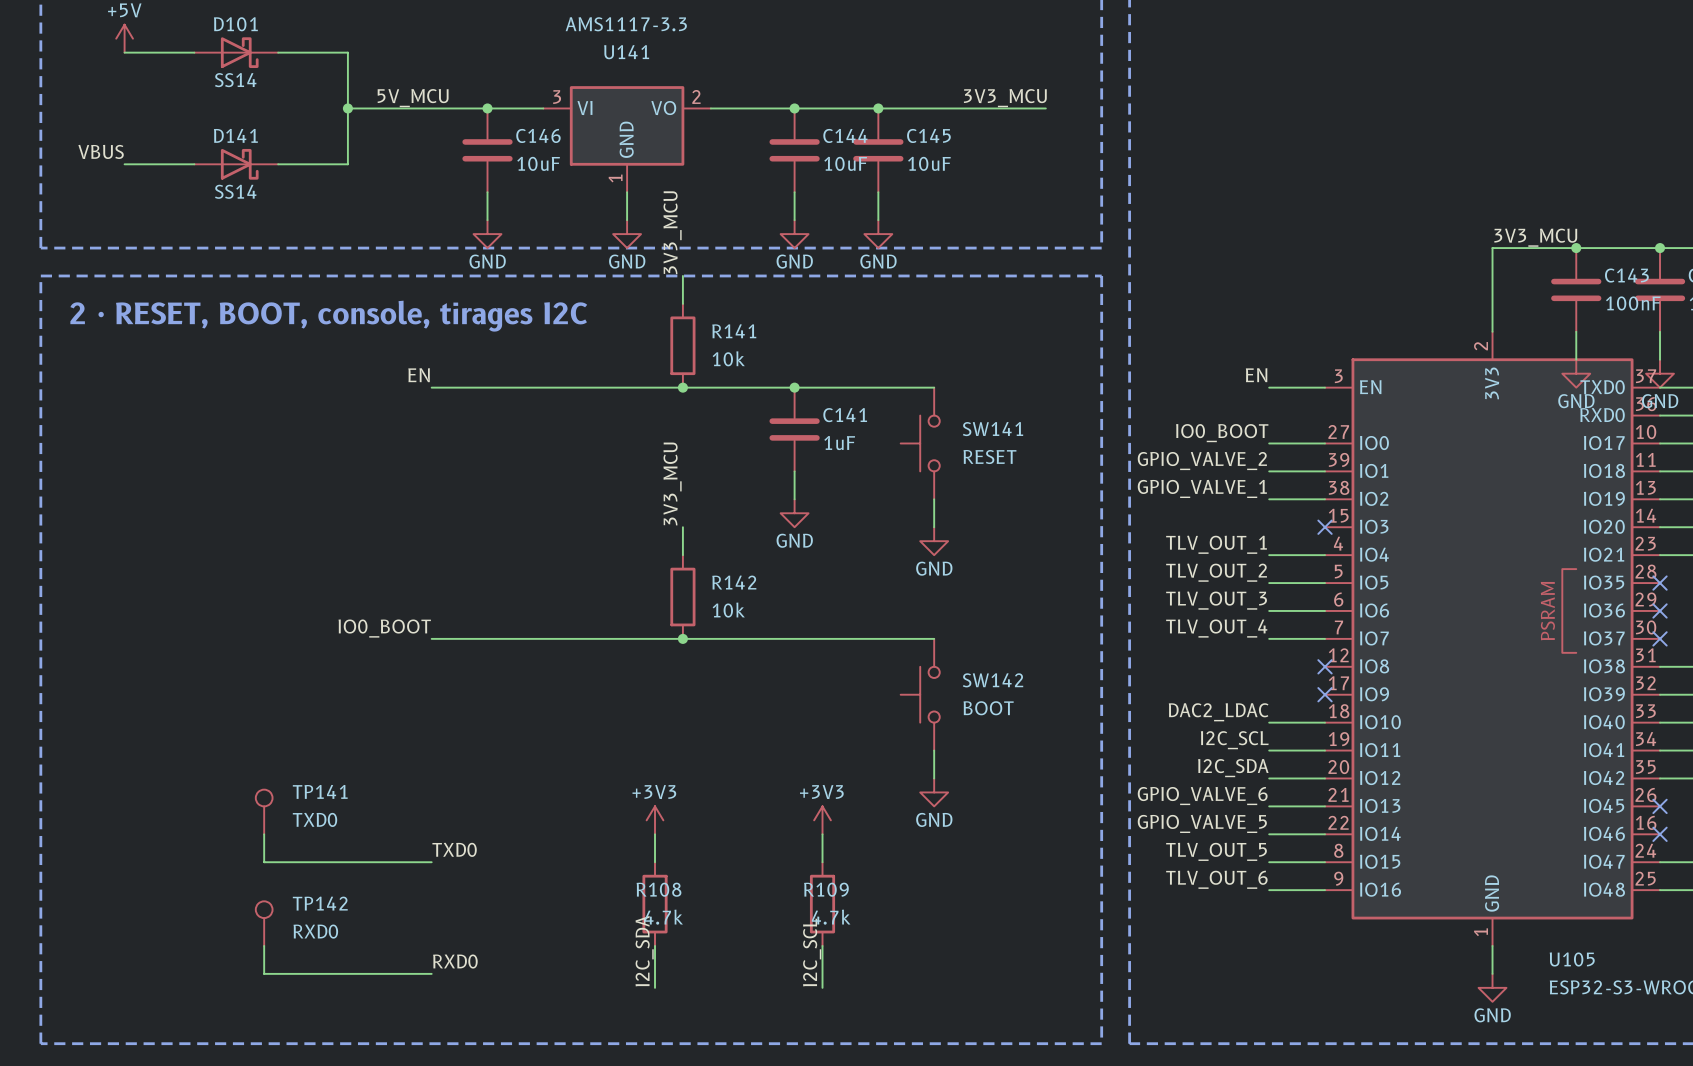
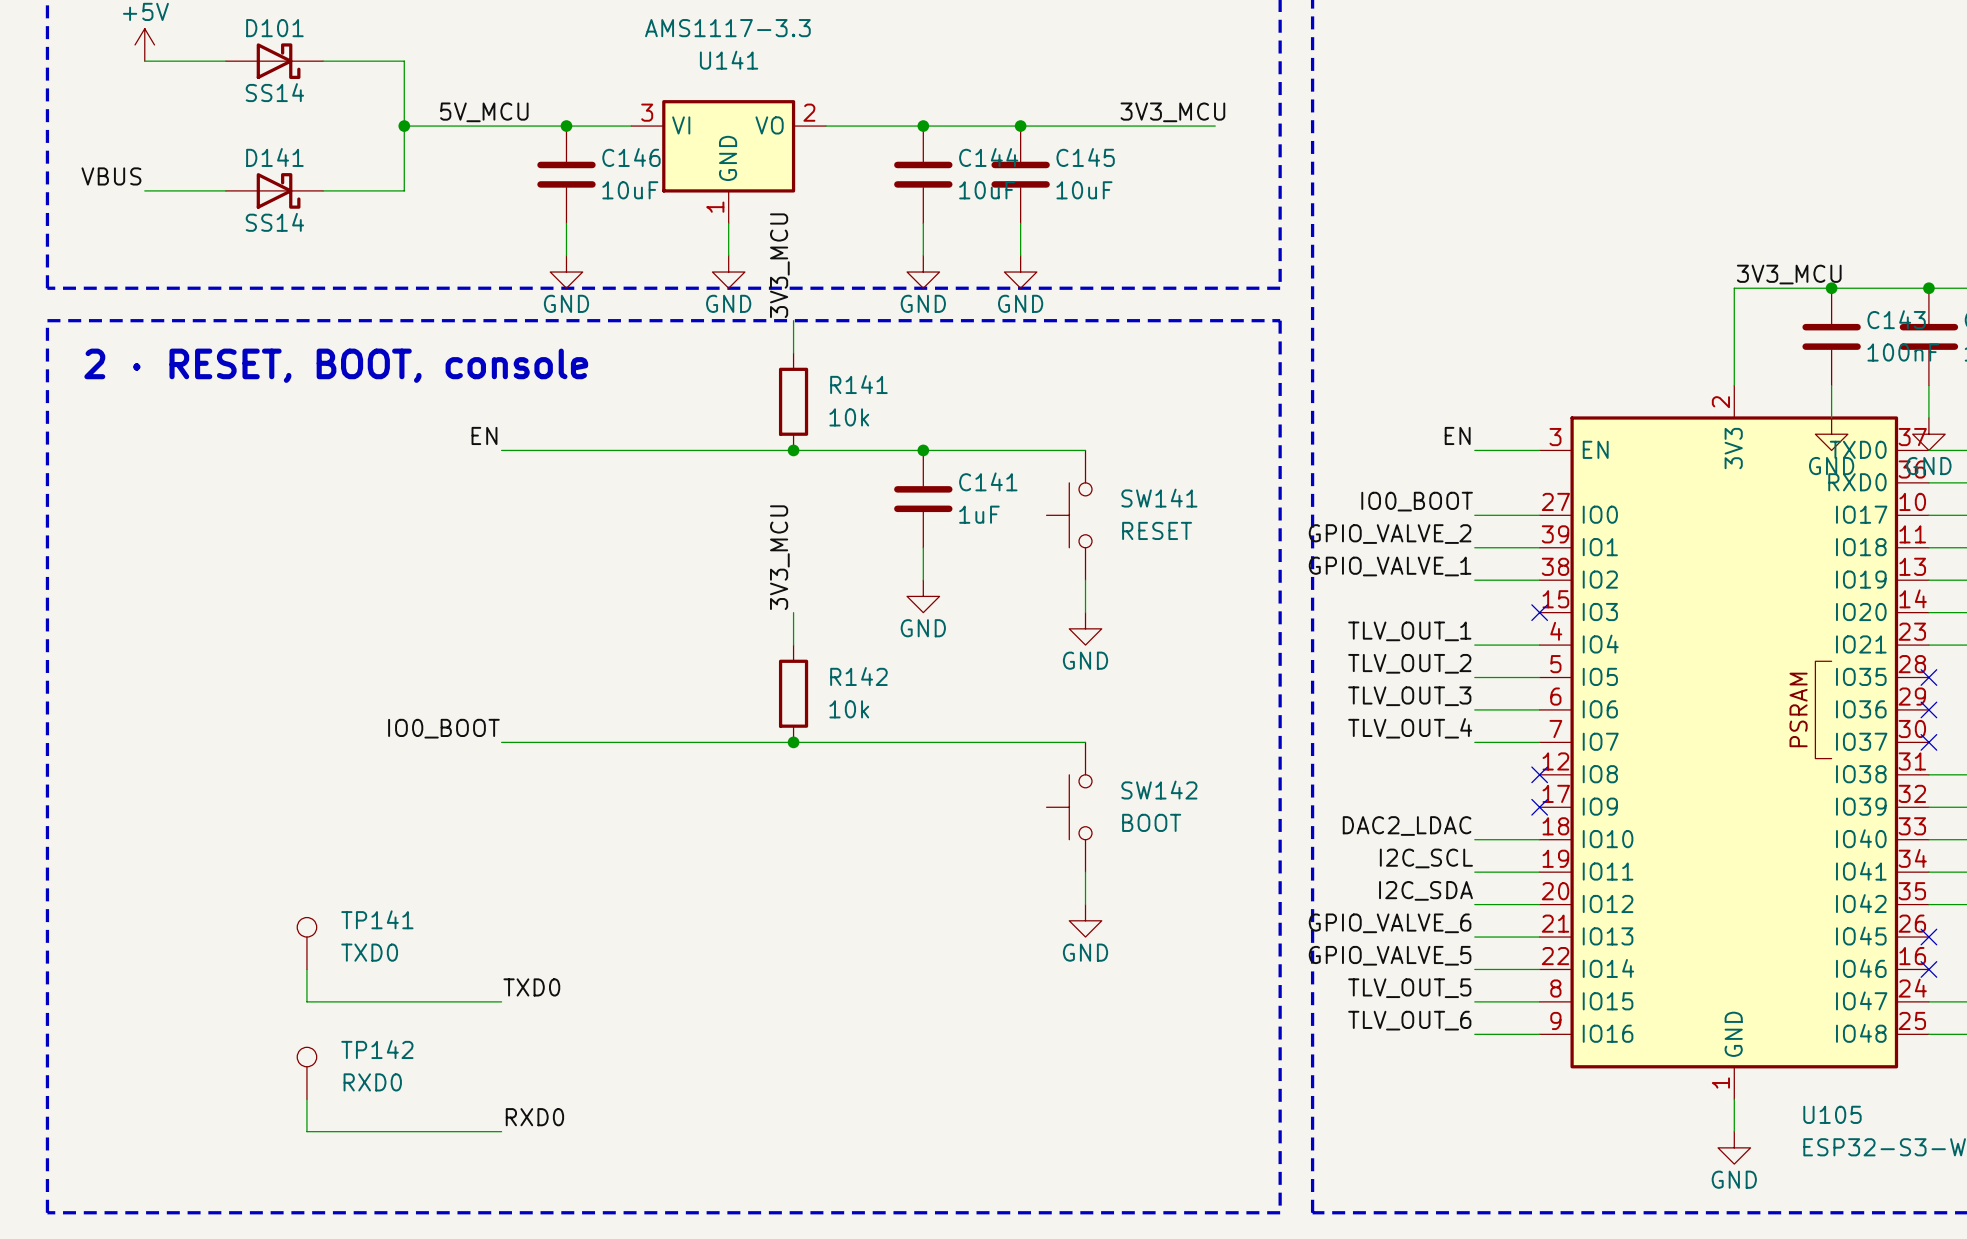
text: 2 · RESET, BOOT, console, tirages I2C (328, 316) -> 2 · RESET, BOOT, console (336, 365)
power symbol: +3V3 (655, 820) -> none
power symbol: +3V3 (822, 820) -> none
wire: (655, 834) (655, 862) -> none
wire: (822, 834) (822, 862) -> none
R108: 4.7k (655, 904) -> none
R109: 4.7k (822, 904) -> none
wire: (655, 945) (655, 987) -> none
wire: (822, 945) (822, 987) -> none
label: I2C_SDA (644, 951) -> none
label: I2C_SCL (812, 952) -> none

